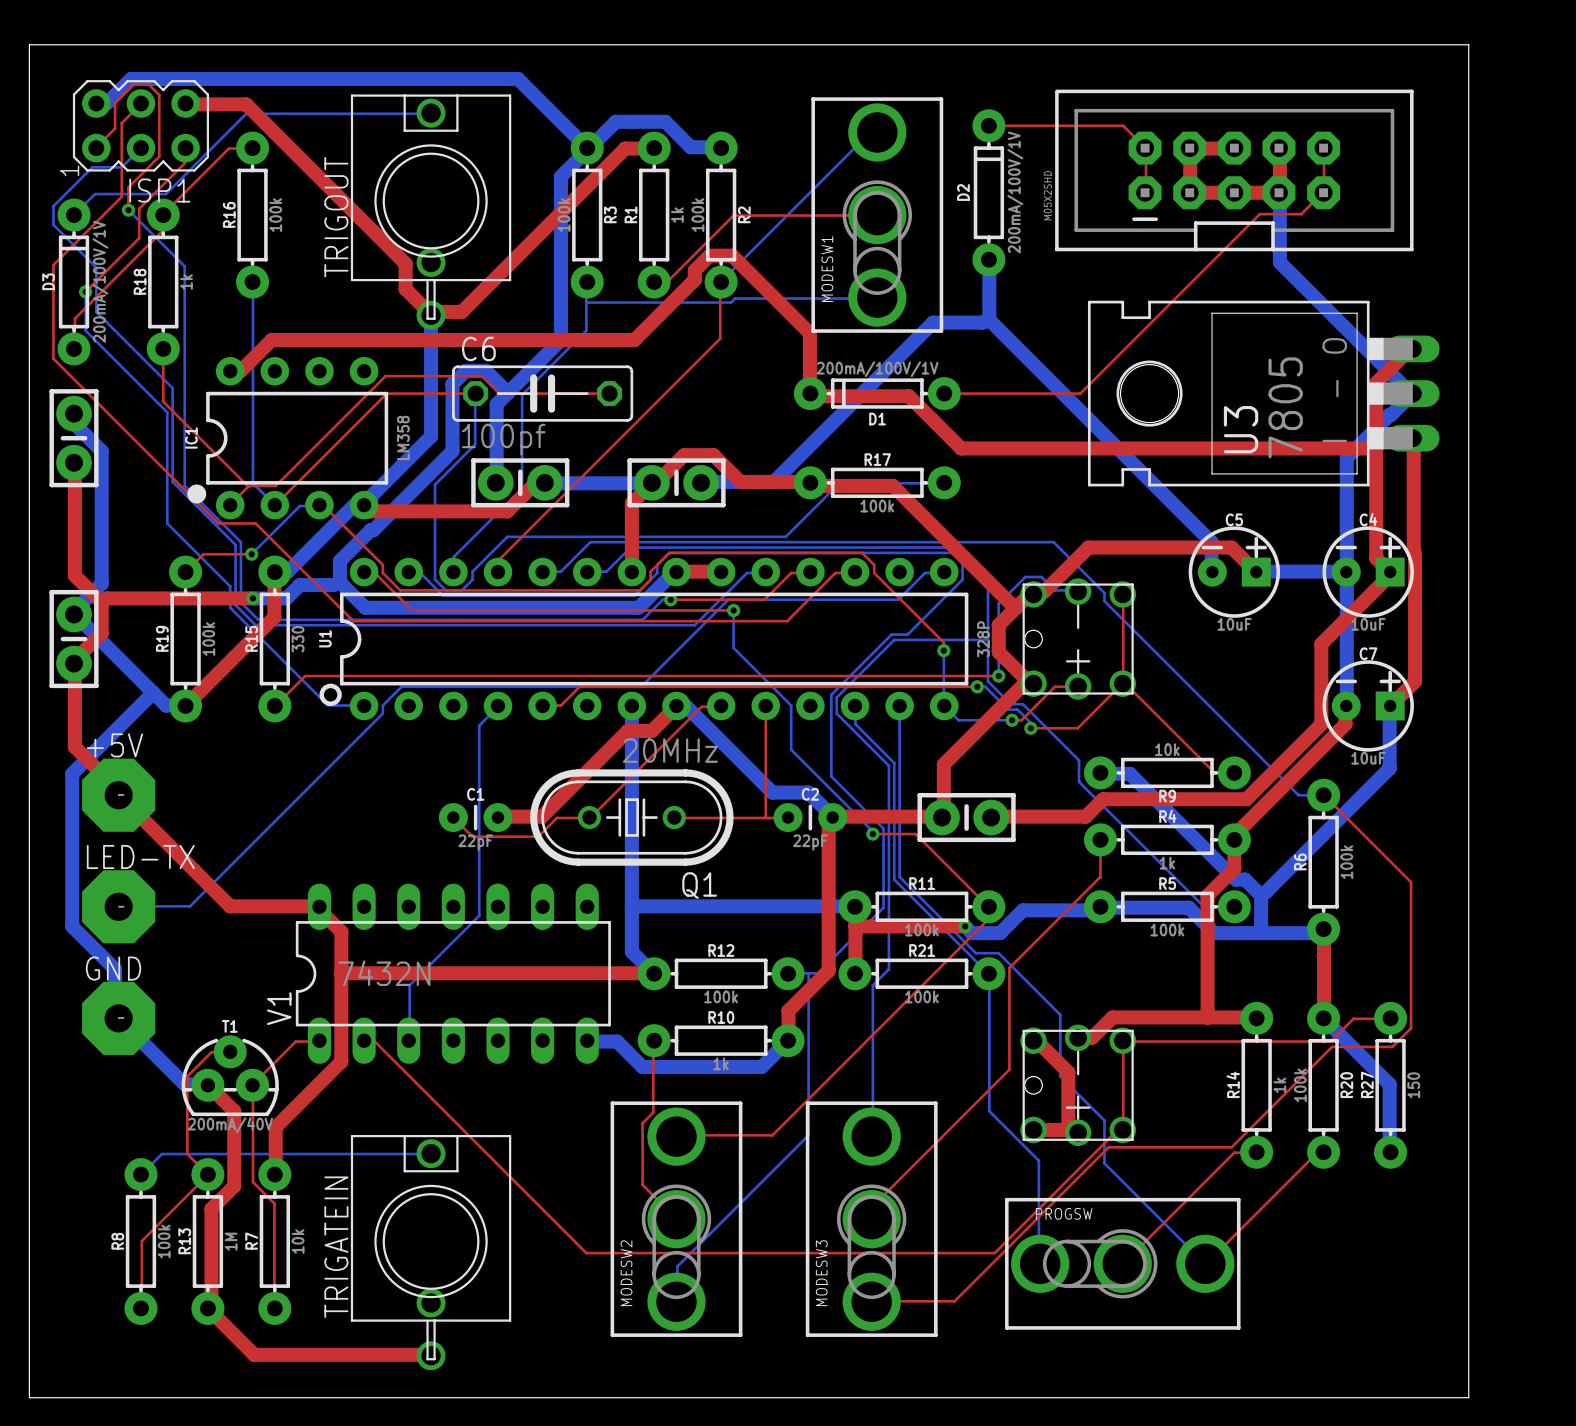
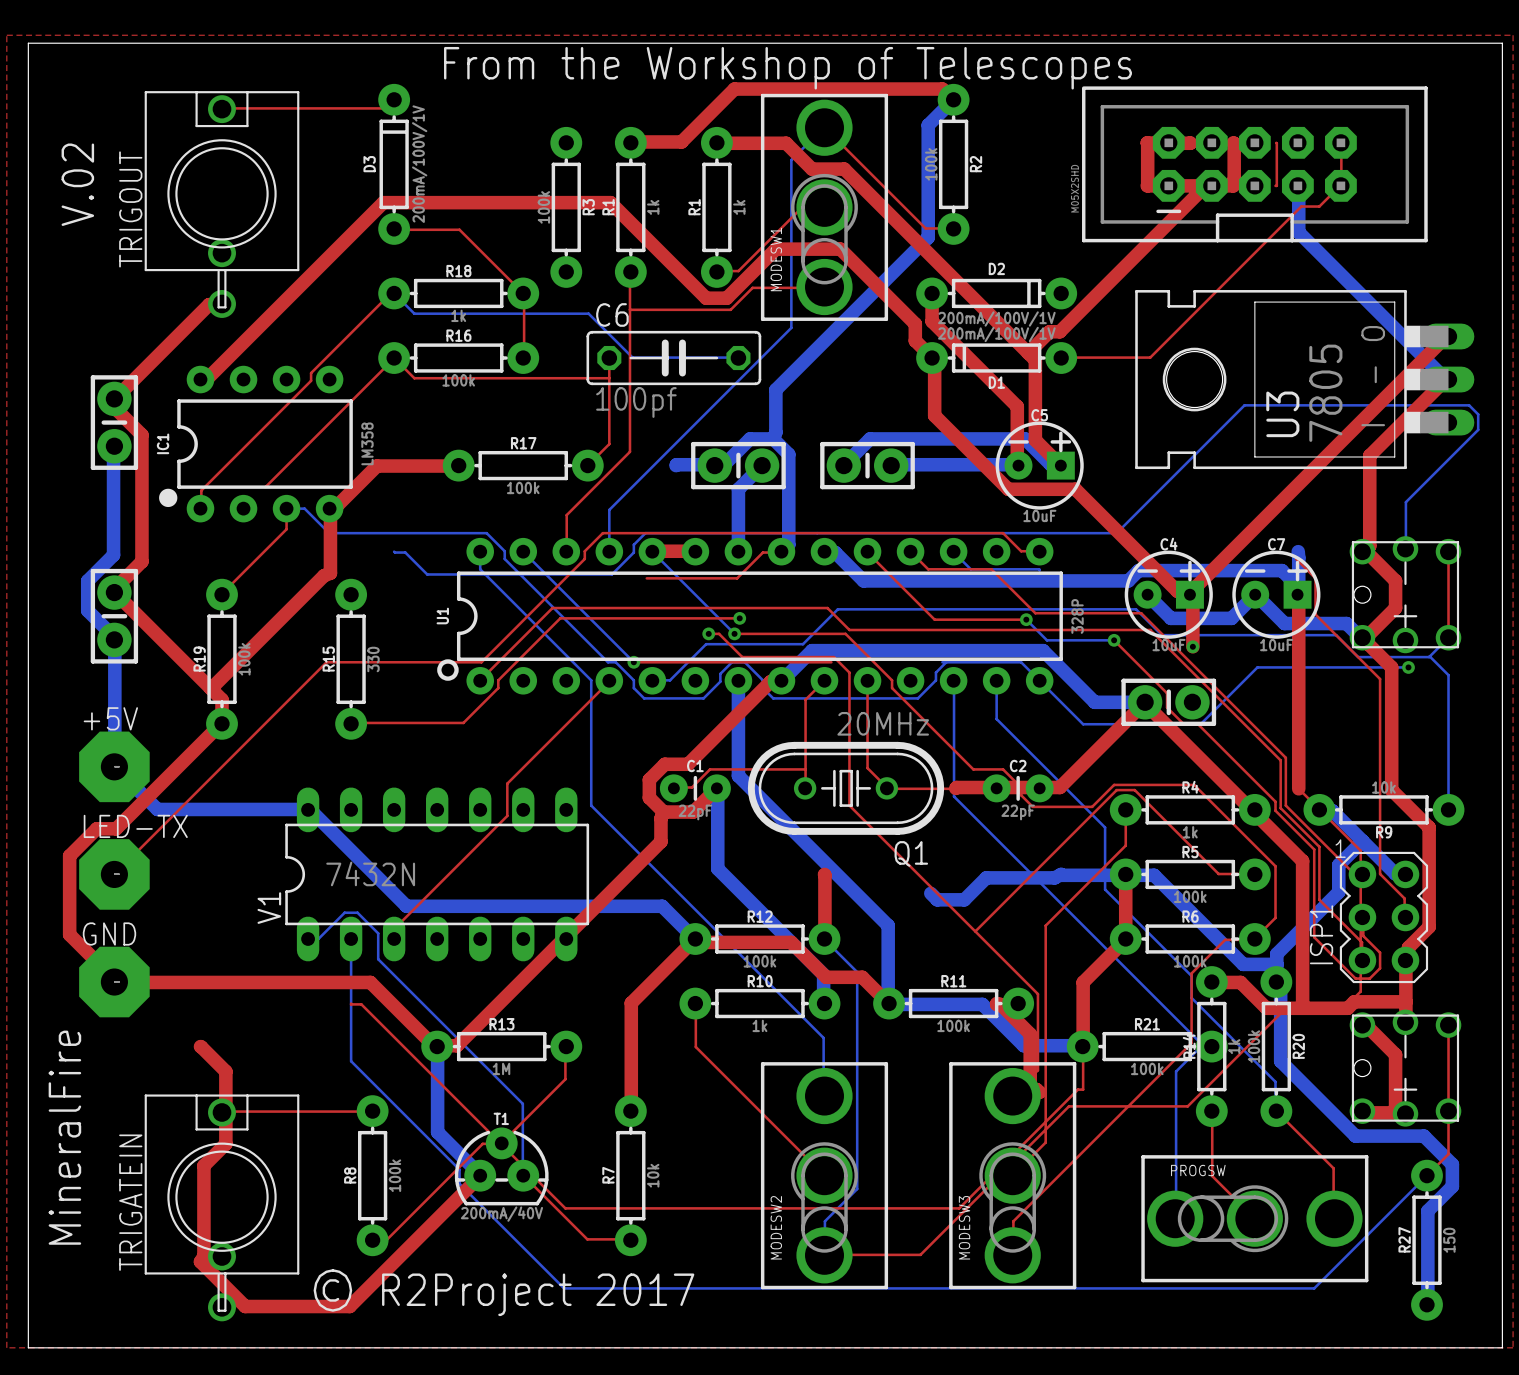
top zone outline: none -> (6, 35) (1513, 35) (1513, 1347) (6, 1347) (6, 35)
board edge: (1468, 44) (1468, 1397) -> (1416, 43) (1502, 43) (1502, 1347) (1416, 1347)
text: none -> From the Workshop of Telescopes (788, 68)
bottom track: (96, 103) (107, 103) (131, 78) (518, 78) (587, 148) -> none
top track: (140, 103) (121, 123) (121, 196) (53, 265) (53, 358) (218, 523) (255, 523) (353, 621) (787, 621) (835, 572) (855, 572) -> none
top track: (185, 103) (246, 104) (405, 263) (405, 289) (431, 315) (437, 311) (461, 311) (625, 148) (654, 148) -> (953, 99) (942, 89) (734, 89) (681, 141) (630, 142)
top track: none -> (394, 99) (385, 108) (222, 109)
bottom track: none -> (953, 99) (928, 125) (928, 237) (775, 389) (775, 432) (773, 438)
bottom track: (431, 113) (246, 113) (165, 194) (94, 194) (74, 215) -> none
ISP1 rotation: 0° (140, 125) -> 90° clockwise (1383, 917)
ISP1 position: (140, 125) -> (1383, 917)
top track: (988, 125) (1123, 125) (1145, 148) (1145, 192) -> none
top track: none -> (824, 127) (925, 228) (953, 228)
bottom track: none -> (824, 127) (791, 160) (791, 327) (609, 509) (609, 551)
bottom track: (877, 132) (870, 132) (721, 282) -> none
top track: (96, 148) (115, 128) (115, 103) (133, 84) (148, 84) (159, 95) (159, 156) (128, 187) (128, 210) -> none
bottom track: (140, 148) (121, 167) (92, 167) (53, 206) (53, 224) (96, 267) (96, 311) (172, 388) (172, 481) (235, 544) (235, 605) (255, 625) (694, 625) (747, 572) (765, 572) -> (762, 465) (738, 489) (738, 551)
top track: (185, 148) (184, 163) (139, 208) (139, 238) (85, 291) -> none
top track: (252, 148) (228, 148) (163, 214) (163, 230) (74, 318) (74, 348) -> none
bottom track: (587, 148) (615, 121) (665, 121) (690, 147) (721, 148) -> none
bottom track: (587, 148) (560, 176) (560, 340) (496, 404) (495, 482) -> none
top track: none -> (716, 142) (786, 143) (812, 169) (844, 169) (1035, 360) (1035, 440) (1060, 465)
top track: none -> (1340, 142) (1341, 185) (1319, 206) (1301, 206) (1150, 357) (1061, 358)
part position: (1234, 170) -> (1254, 164)
text: none -> V.02 (77, 184)
D2 rotation: 0° (988, 192) -> 90° clockwise (996, 293)
D2 position: (988, 192) -> (996, 293)
top track: none -> (1211, 185) (1203, 188) (1059, 331) (1049, 331) (1028, 353)
bottom track: (1278, 192) (1279, 262) (1412, 393) (1346, 457) (1346, 571) (1256, 572) -> none
top track: (1322, 192) (1301, 214) (1259, 214) (1080, 393) (944, 393) -> none
bottom track: none -> (1297, 185) (1298, 232) (1445, 379) (1448, 379)
bottom track: (128, 210) (184, 266) (184, 485) (240, 542) (240, 602) (258, 619) (642, 619) (662, 599) (670, 599) -> none
via: (128, 210) -> none
TRIGOUT position: (431, 212) -> (222, 204)
R16 rotation: 0° (252, 215) -> 90° clockwise (458, 358)
R16 position: (252, 215) -> (458, 358)
R2 position: (721, 215) -> (953, 164)
R1: none -> 1k (716, 207)
top track: (831, 215) (733, 215) (668, 281) (654, 282) -> (801, 207) (738, 271) (716, 271)
MODESW1 position: (877, 215) -> (824, 207)
top track: none -> (394, 228) (459, 229) (524, 294) (523, 358)
bottom track: (988, 259) (989, 319) -> none
D3 position: (74, 282) -> (394, 164)
R18 rotation: 0° (163, 282) -> 90° clockwise (458, 293)
R18 position: (163, 282) -> (458, 293)
bottom track: (252, 282) (252, 483) (274, 505) -> none
bottom track: (587, 282) (586, 330) (522, 394) (522, 488) (453, 556) (453, 572) -> none
top track: none -> (630, 271) (629, 451) (566, 515) (566, 551)
top track: (721, 282) (720, 338) (497, 560) (497, 572) -> none
bottom track: (85, 291) (85, 330) (167, 412) (167, 523) (230, 586) (230, 607) (327, 705) (364, 705) -> none
via: (85, 291) -> none
top track: none -> (824, 287) (752, 287) (730, 309) (629, 309)
bottom track: (877, 297) (734, 298) (730, 302) (586, 302) -> none
top track: none -> (394, 293) (389, 294) (311, 373) (311, 380) (201, 490) (200, 508)
bottom track: none -> (394, 293) (414, 313) (588, 313) (632, 357) (738, 358)
top track: none -> (932, 293) (932, 321) (1017, 406) (1018, 465)
top track: none -> (222, 303) (209, 304) (114, 398) (117, 410) (141, 435) (141, 561) (117, 586) (114, 592) (222, 699) (222, 723) (116, 828) (96, 828) (69, 855) (69, 934) (110, 976) (114, 982) (370, 982) (431, 1043) (437, 1046) (456, 1045) (562, 939) (565, 939) (569, 933) (660, 841) (660, 818) (663, 812)
bottom track: (431, 315) (431, 436) (368, 499) (364, 506) (353, 506) (287, 571) (274, 572) -> none
bottom track: (989, 319) (982, 322) (933, 322) (773, 481) (751, 481) -> (773, 438) (750, 438) (724, 464)
bottom track: (989, 319) (1211, 542) (1212, 572) -> none
top track: (163, 348) (163, 401) (248, 486) -> none
top track: (1412, 348) (1409, 349) (1376, 382) (1376, 558) (1390, 572) (1386, 578) (1321, 643) (1321, 724) (1246, 799) (1103, 799) (1085, 816) -> (1302, 1008) (1302, 861) (1257, 815) (1254, 809) (1250, 809) (1145, 702) (1059, 787) (1046, 787)
top track: none -> (1448, 336) (1445, 336) (1189, 594)
top track: (230, 371) (240, 370) (271, 340) (634, 340) (694, 279) (694, 270) (709, 255) (732, 255) (809, 333) (809, 393) (816, 396) (909, 396) (961, 448) (1376, 448) -> none
top track: none -> (609, 358) (609, 444) (587, 465)
bottom track: (508, 392) (485, 370) (465, 370) (452, 384) (452, 451) (340, 560) (340, 582) -> none
top track: none -> (200, 379) (206, 379) (383, 202) (610, 202) (706, 298) (726, 298) (775, 249) (840, 249) (915, 324) (915, 340) (932, 357) (934, 364) (934, 415) (1008, 489) (1075, 489) (1177, 591) (1189, 594)
top track: (386, 393) (475, 393) -> (373, 379) (394, 358) (414, 378) (609, 378)
bottom track: (475, 393) (475, 444) (435, 484) (435, 579) (445, 590) (461, 590) (472, 579) (472, 571) (507, 536) (785, 536) (839, 483) (944, 482) -> none
C6 position: (542, 393) -> (673, 358)
top track: (609, 393) (499, 393) (481, 376) (385, 376) (275, 485) (248, 485) (230, 505) -> none
D1 position: (877, 393) -> (996, 358)
U3 position: (1263, 393) -> (1304, 379)
top track: none -> (1448, 379) (1445, 379) (1369, 455) (1369, 546) (1362, 551) (1367, 552) (1395, 580) (1395, 608) (1365, 637) (1362, 637) (1391, 667) (1391, 790) (1429, 827) (1429, 926) (1408, 947) (1405, 960) (1405, 1022)
bottom track: (74, 413) (74, 424) (101, 451) (101, 583) (77, 607) (74, 614) (165, 705) (185, 705) -> none
part position: (74, 438) -> (114, 422)
IC1 position: (287, 438) -> (255, 444)
top track: (1412, 438) (1415, 681) (1390, 705) -> none
bottom track: none -> (773, 438) (788, 454) (788, 544) (781, 551)
top track: (74, 462) (74, 575) (101, 602) -> none
bottom track: none -> (114, 446) (113, 555) (87, 580) (87, 610) (114, 640) (114, 766) (157, 809) (307, 809) (313, 813) (406, 906) (662, 906) (695, 938)
top track: none -> (458, 465) (376, 466) (336, 506) (329, 508) (330, 573) (324, 575) (211, 688)
part: (520, 482) -> none
top track: (544, 482) (535, 483) (507, 511) (369, 511) (364, 505) -> none
bottom track: (544, 482) (651, 482) -> none
part position: (676, 482) -> (738, 465)
bottom track: none -> (843, 465) (870, 438) (1025, 438) (1050, 464) (1060, 465)
R17 position: (877, 482) -> (523, 465)
part: none -> (867, 465)
bottom track: none -> (891, 465) (1018, 465)
top track: (319, 505) (323, 506) (382, 564) (382, 572) (400, 590) (639, 590) (650, 579) (650, 571) (669, 552) -> (114, 874) (326, 662) (481, 662) (584, 558) (584, 551) (602, 533) (645, 533)
bottom track: (319, 505) (299, 506) (251, 554) -> none
top track: none -> (286, 508) (286, 529) (222, 594)
top track: (862, 552) (874, 564) (874, 572) (943, 642) (943, 650) -> (831, 533) (1003, 533) (1021, 551) (1039, 551)
bottom track: (951, 552) (962, 563) (962, 579) (907, 634) (891, 634) (831, 694) (831, 776) (883, 828) (883, 907) (817, 973) (788, 973) -> (917, 533) (1116, 533) (1244, 405) (1469, 405) (1478, 414) (1478, 429) (1405, 502) (1405, 548)
top track: (251, 554) (203, 554) (185, 572) -> none
via: (251, 554) -> none
top track: (274, 572) (274, 617) (185, 705) -> none
top track: (364, 572) (374, 572) (412, 610) (733, 610) -> none
bottom track: none -> (480, 551) (480, 569) (591, 680) (591, 805) (823, 1037) (824, 1096)
bottom track: (542, 572) (560, 571) (590, 542) (1053, 542) (1104, 593) (1104, 601) (1298, 795) (1323, 795) -> (523, 551) (633, 662)
bottom track: (587, 572) (606, 571) (630, 547) (954, 547) (988, 581) (988, 681) (1010, 704) (1022, 704) (1079, 760) (1079, 781) (1203, 906) (1234, 906) -> none
top track: (631, 572) (631, 503) (684, 455) (713, 455) (740, 481) (809, 481) (816, 485) (892, 485) (1015, 608) -> none
bottom track: (676, 572) (638, 607) (365, 607) (340, 582) -> (652, 551) (734, 633)
top track: none -> (867, 551) (934, 619) (1026, 619)
top track: none -> (910, 551) (928, 569) (991, 569) (1035, 613) (1141, 613) (1285, 757) (1285, 805) (1354, 874) (1362, 874)
bottom track: (944, 572) (925, 572) (898, 599) (728, 599) (641, 686) (638, 686) -> none
C5 position: (1234, 572) -> (1039, 465)
top track: (1256, 572) (1231, 547) (1088, 547) (1044, 591) (1029, 594) (998, 625) (998, 651) (1029, 682) (1033, 683) (1022, 685) (943, 764) (943, 809) (942, 817) (832, 816) (828, 823) (828, 970) (788, 1010) (788, 1040) -> none
C4 position: (1368, 572) -> (1168, 594)
top track: none -> (1448, 551) (1448, 637)
top track: none -> (1296, 558) (1315, 578) (1315, 614) (1380, 679) (1380, 874) (1404, 898) (1405, 917)
bottom track: (340, 582) (333, 585) (299, 585) (286, 598) (252, 598) -> none
bottom track: (1054, 590) (1041, 577) (1025, 577) (998, 603) (998, 676) -> (1017, 569) (970, 569) (953, 551)
top track: (1122, 594) (1122, 683) -> none
top track: (252, 598) (107, 598) (101, 602) -> none
via: (252, 598) -> none
via: (670, 599) -> none
top track: (101, 602) (101, 633) (77, 657) (74, 663) (74, 747) (116, 788) (118, 795) (230, 906) (318, 906) (341, 931) (341, 1061) (275, 1127) (274, 1174) -> none
bottom track: (733, 610) (733, 647) (772, 686) -> (615, 662) (633, 680) (633, 688) (644, 698) (703, 698) (720, 681) (720, 673) (731, 662) (744, 662)
via: (733, 610) -> none
bottom track: (1346, 615) (1346, 705) -> (1298, 593) (1292, 580) (1281, 570) (1138, 570) (1128, 580) (863, 580) (835, 552) (824, 551)
bottom track: none -> (1147, 594) (1170, 618) (1231, 618) (1255, 594) (1284, 623) (1346, 623) (1362, 637)
top track: none -> (1189, 594) (1192, 600) (1192, 646)
part: none -> (1405, 594)
part position: (74, 639) -> (114, 616)
R19 position: (185, 639) -> (222, 659)
R15 position: (274, 639) -> (351, 659)
U1 position: (643, 639) -> (750, 616)
bottom track: (988, 639) (894, 639) (836, 697) (836, 713) (888, 765) (888, 969) (872, 985) (871, 1136) -> none
part: (1078, 639) -> none
top track: none -> (739, 618) (560, 618) (498, 680) (498, 688) (463, 722) (351, 723)
via: none -> (739, 618)
bottom track: none -> (1026, 619) (1046, 640) (1114, 640)
via: none -> (1026, 619)
bottom track: (943, 650) (943, 705) (958, 720) (1012, 720) -> none
via: (943, 650) -> none
top track: none -> (708, 633) (719, 633) (742, 657) (833, 657) (849, 672) (849, 805) (1037, 994) (1037, 1070) (1012, 1096)
via: none -> (708, 633)
top track: none -> (734, 633) (845, 633) (892, 680) (892, 688) (973, 769) (1003, 769) (1021, 787) (1021, 795) (1032, 806) (1092, 806) (1114, 784) (1194, 784) (1275, 866) (1275, 917) (1254, 939) (1225, 939) (1191, 973) (1191, 1043) (1013, 1221) (1012, 1255)
via: none -> (734, 633)
top track: none -> (1114, 640) (1167, 693) (1167, 707) (1183, 724) (1198, 724) (1275, 801) (1275, 810) (1314, 849) (1314, 937) (1355, 978) (1369, 978) (1380, 968) (1380, 952) (1363, 935) (1362, 917)
via: none -> (1114, 640)
via: none -> (1192, 646)
top track: (998, 676) (305, 676) (274, 705) -> none
via: (998, 676) -> none
bottom track: none -> (1429, 656) (1448, 675) (1448, 809)
bottom track: (630, 686) (401, 686) (382, 705) (382, 713) (190, 906) (118, 906) -> (608, 662) (504, 558) (504, 551) (486, 533) (329, 533) (304, 508) (286, 508)
top track: (657, 686) (579, 686) (560, 705) (542, 705) -> none
via: none -> (633, 662)
top track: (862, 686) (977, 686) -> none
via: (977, 686) -> none
bottom track: (985, 686) (1008, 709) (1017, 709) (1030, 722) (1030, 728) -> (950, 662) (1021, 662) (1083, 724) (1200, 724) (1257, 667) (1408, 667)
top track: (1078, 686) (1054, 686) (1021, 720) (1012, 720) -> none
bottom track: (153, 692) (72, 773) (72, 926) (115, 969) (115, 1012) (118, 1018) (184, 1084) (207, 1085) -> none
via: none -> (1408, 667)
top track: none -> (480, 680) (552, 608) (827, 608) (849, 630) (1150, 630) (1280, 760) (1280, 808) (1319, 846) (1319, 899) (1362, 942) (1362, 960)
bottom track: (497, 705) (479, 725) (479, 915) (409, 985) (408, 1040) -> none
top track: none -> (609, 680) (507, 783) (507, 815) (395, 928) (394, 938)
bottom track: (631, 705) (631, 951) (654, 973) -> none
top track: (676, 705) (651, 730) (627, 730) (542, 816) (497, 817) -> none
bottom track: (676, 705) (686, 706) (772, 792) (808, 792) (832, 817) -> (652, 680) (670, 680) (706, 644) (802, 644) (837, 609) (1136, 609) (1161, 635) (1336, 635) (1358, 657) (1429, 657) (1448, 637)
top track: (721, 705) (701, 706) (590, 817) (556, 817) (538, 836) (472, 836) (453, 817) -> none
top track: (765, 705) (765, 817) -> none
bottom track: none -> (738, 680) (738, 775) (888, 925) (888, 1003) (982, 1004) (1023, 1045) (1082, 1046)
top track: none -> (781, 680) (770, 681) (688, 764) (664, 764) (649, 779) (649, 797) (663, 812)
bottom track: none -> (781, 680) (812, 650) (1043, 650) (1094, 702) (1145, 702)
top track: none -> (824, 680) (805, 699) (805, 788)
bottom track: (855, 705) (855, 724) (894, 763) (894, 879) (989, 974) (989, 1111) (1038, 1160) (1040, 1263) -> none
top track: none -> (867, 680) (867, 768) (886, 788) (996, 788)
bottom track: (899, 705) (899, 876) (975, 953) (998, 953) (1060, 1014) (1060, 1076) (1104, 1120) (1104, 1163) (1205, 1263) -> none
bottom track: none -> (953, 680) (954, 796) (1203, 1045) (1211, 1046) (1201, 1045) (1176, 1071) (1175, 1218)
bottom track: none -> (996, 680) (996, 719) (1105, 827) (1105, 889) (1191, 976) (1191, 997) (1275, 1081) (1276, 1111)
top track: (1346, 705) (1345, 724) (1238, 831) (1234, 839) (1234, 868) (1207, 895) (1207, 1017) -> none
C7 position: (1368, 705) -> (1276, 594)
bottom track: (1390, 705) (1389, 768) (1261, 895) -> none
bottom track: (791, 713) (791, 749) (872, 831) (872, 834) -> (762, 688) (773, 698) (917, 698) (935, 680) (935, 672) (946, 662)
via: (1012, 720) -> none
top track: (1030, 728) (1077, 728) (1124, 682) (1214, 772) (1234, 772) -> none
via: (1030, 728) -> none
part: none -> (1168, 702)
bottom track: (1100, 772) (1129, 773) (1235, 879) (1245, 879) (1261, 895) -> none
R9 position: (1167, 772) -> (1383, 809)
top track: (1323, 795) (1346, 817) -> (1297, 594) (1298, 788)
top track: none -> (805, 769) (710, 769) (691, 787) (673, 788)
C1 position: (475, 817) -> (695, 788)
Q1 position: (631, 817) -> (846, 788)
top track: (674, 817) (788, 817) -> none
top track: none -> (716, 788) (693, 812) (663, 812)
bottom track: none -> (716, 788) (717, 868) (823, 974) (824, 1003)
C2 position: (810, 817) -> (1018, 788)
part: (966, 817) -> none
top track: (872, 834) (915, 834) (988, 906) (988, 919) (772, 1135) (676, 1136) -> none
via: (872, 834) -> none
top track: (1100, 839) (1100, 876) -> (1254, 874) (1218, 874) (1134, 790) (1116, 790) (1061, 845)
top track: none -> (1125, 809) (1125, 845) (1045, 925) (1045, 1142) (1012, 1175)
R4 position: (1167, 839) -> (1190, 809)
bottom track: none -> (1319, 809) (1332, 810) (1395, 874) (1405, 874)
R6 rotation: 0° (1323, 862) -> 90° clockwise (1190, 938)
R6 position: (1323, 862) -> (1190, 938)
bottom track: none -> (1362, 841) (1338, 864) (1338, 892) (1276, 954) (1276, 982) (1280, 987) (1280, 1061) (1355, 1136) (1423, 1136) (1452, 1164) (1452, 1186) (1427, 1210) (1426, 1304)
bottom track: (1261, 895) (1261, 933) -> none
bottom track: (631, 906) (855, 906) -> none
R11 position: (921, 906) -> (953, 1003)
R5 position: (1167, 906) -> (1190, 874)
bottom track: (1188, 907) (1214, 933) (1318, 933) (1323, 929) -> (1146, 875) (1154, 875) (1243, 964) (1276, 964)
top track: (855, 926) (965, 926) -> none
via: (965, 926) -> none
top track: (1323, 929) (1323, 1018) -> none
top track: (1011, 965) (1009, 967) (1009, 1069) (872, 1206) (871, 1219) -> none
bottom track: none -> (308, 938) (318, 938) (344, 912) (357, 912) (378, 933) (378, 959) (522, 1103) (523, 1175)
top track: (341, 973) (654, 973) -> none
bottom track: none -> (351, 938) (351, 1061) (459, 1169) (459, 1183) (564, 1288) (1314, 1288) (1426, 1175)
V1 position: (453, 973) -> (437, 874)
R12 position: (721, 973) -> (759, 938)
bottom track: (808, 973) (808, 1135) (677, 1266) (676, 1301) -> none
bottom track: none -> (824, 938) (857, 972) (857, 1189) (824, 1221) (824, 1255)
R21 position: (921, 973) -> (1147, 1046)
top track: (1256, 1018) (1112, 1017) (1092, 1037) (1078, 1037) -> (1211, 982) (1240, 982) (1266, 1008) (1347, 1008) (1354, 1001) (1405, 1001)
bottom track: (1323, 1018) (1389, 1084) (1390, 1152) -> none
top track: (1390, 1018) (1353, 1018) (1330, 1041) (1123, 1041) -> (1125, 874) (1125, 939) (1083, 982) (1083, 1004)
top track: (319, 1040) (295, 1041) (252, 1085) (252, 1182) (274, 1203) (274, 1308) -> none
bottom track: (587, 1040) (617, 1041) (642, 1067) (761, 1067) (788, 1040) -> none
top track: (654, 1040) (653, 1112) (642, 1123) (642, 1184) (676, 1219) -> none
top track: none -> (695, 1003) (695, 1047) (824, 1175)
R10 position: (721, 1040) -> (759, 1003)
top track: none -> (889, 1003) (862, 977) (826, 977) (791, 942) (700, 942) (695, 938) (631, 1003) (630, 1111)
top track width: thin (1123, 1041) (1123, 1084) -> thick (1083, 1004) (1083, 1045)
top track: (230, 1051) (211, 1052) (187, 1076) (187, 1154) (207, 1174) (141, 1241) (140, 1308) -> none
top track: none -> (1362, 1025) (1365, 1025) (1395, 1054) (1395, 1106) (1405, 1113) (1364, 1112) (1362, 1111)
top track: none -> (1448, 1025) (1448, 1154) (1426, 1175)
T1 position: (230, 1075) -> (501, 1166)
bottom track: none -> (437, 1046) (437, 1132) (480, 1175)
top track: none -> (566, 1046) (565, 1079) (501, 1143) (482, 1143) (387, 1239) (372, 1240)
part: (1078, 1085) -> none
R27 position: (1390, 1085) -> (1426, 1240)
part: none -> (1405, 1068)
top track: none -> (372, 1111) (222, 1112)
top track: (1256, 1152) (1234, 1152) (1122, 1263) -> (1211, 1111) (1212, 1176) (1254, 1218)
top track: (1323, 1152) (1317, 1152) (1205, 1263) -> (1276, 1111) (1333, 1168) (1334, 1218)
bottom track: (431, 1153) (161, 1154) (140, 1174) -> none
text: none -> MineralFire (64, 1137)
top track: none -> (523, 1175) (587, 1239) (630, 1240)
MODESW2 position: (676, 1219) -> (824, 1175)
MODESW3 position: (871, 1219) -> (1012, 1175)
R8 position: (140, 1241) -> (372, 1175)
R13 rotation: 0° (207, 1241) -> 90° clockwise (501, 1046)
R13 position: (207, 1241) -> (501, 1046)
R7 position: (274, 1241) -> (630, 1175)
TRIGATEIN position: (431, 1252) -> (222, 1207)
PROGSW position: (1122, 1263) -> (1254, 1218)
text: none -> © R2Project 2017 (503, 1292)
top track: (362, 1354) (431, 1355) -> (349, 1306) (480, 1175)

